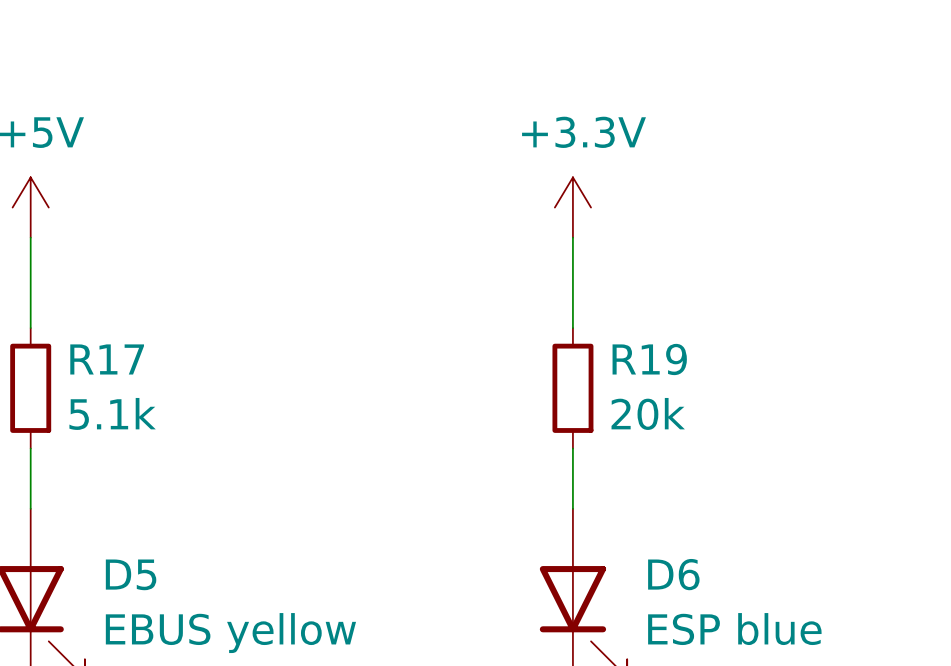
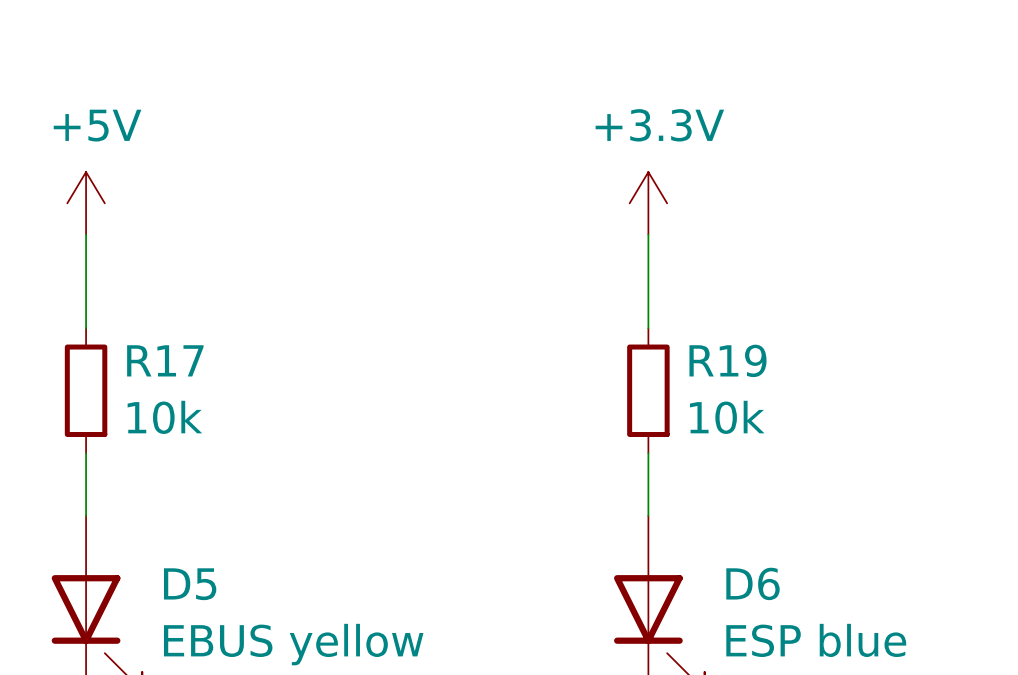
R17 value: 5.1k (112, 413) -> 10k (164, 417)
R19 value: 20k (648, 413) -> 10k (727, 417)

